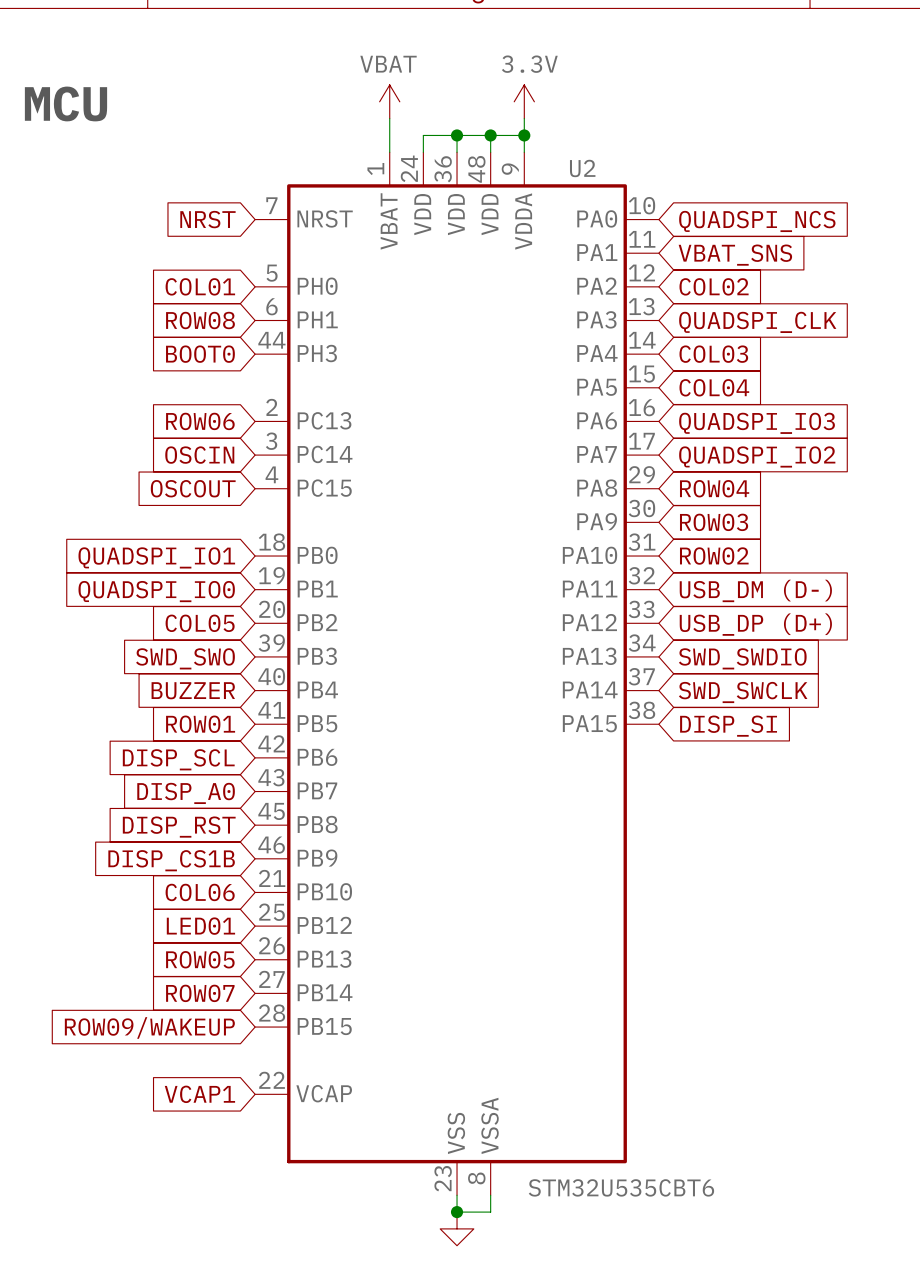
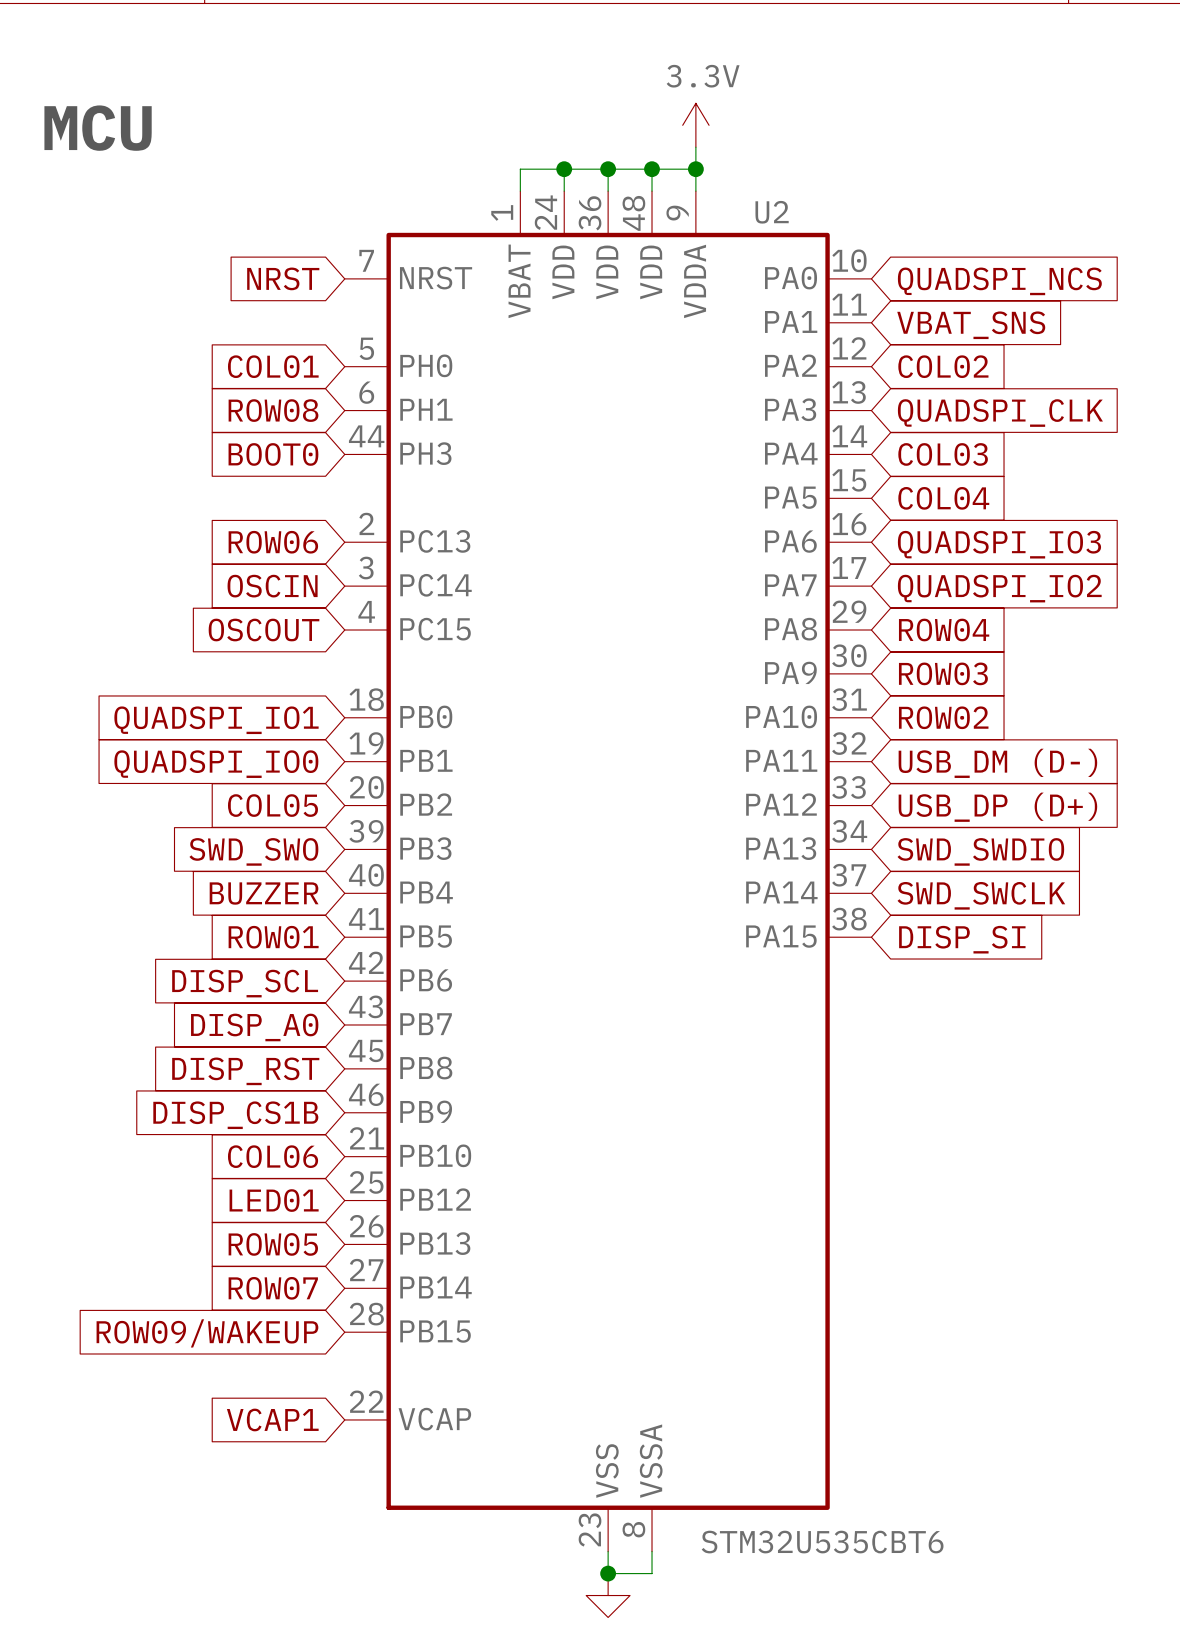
power symbol: VBAT (389, 101) -> none
wire: (389, 118) (389, 135) -> (564, 169) (520, 169)
junction: none -> (564, 169)

